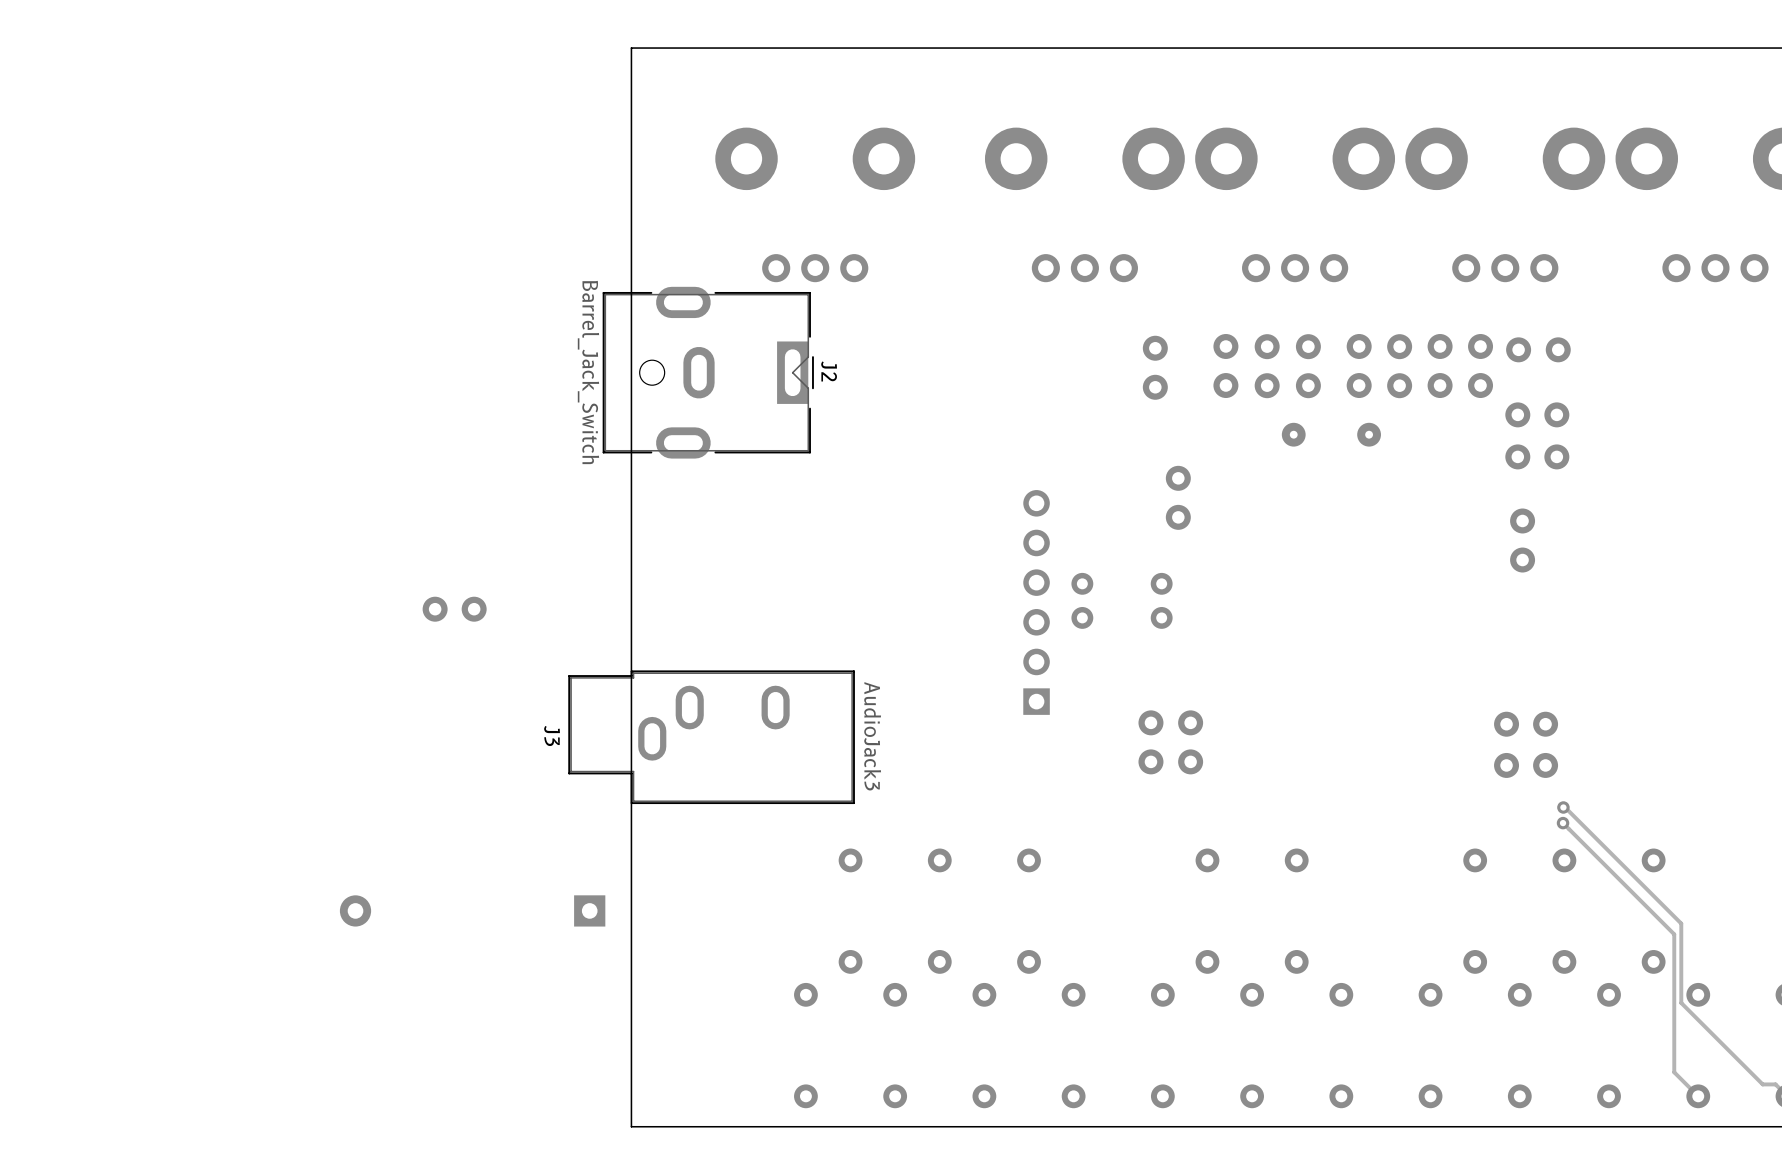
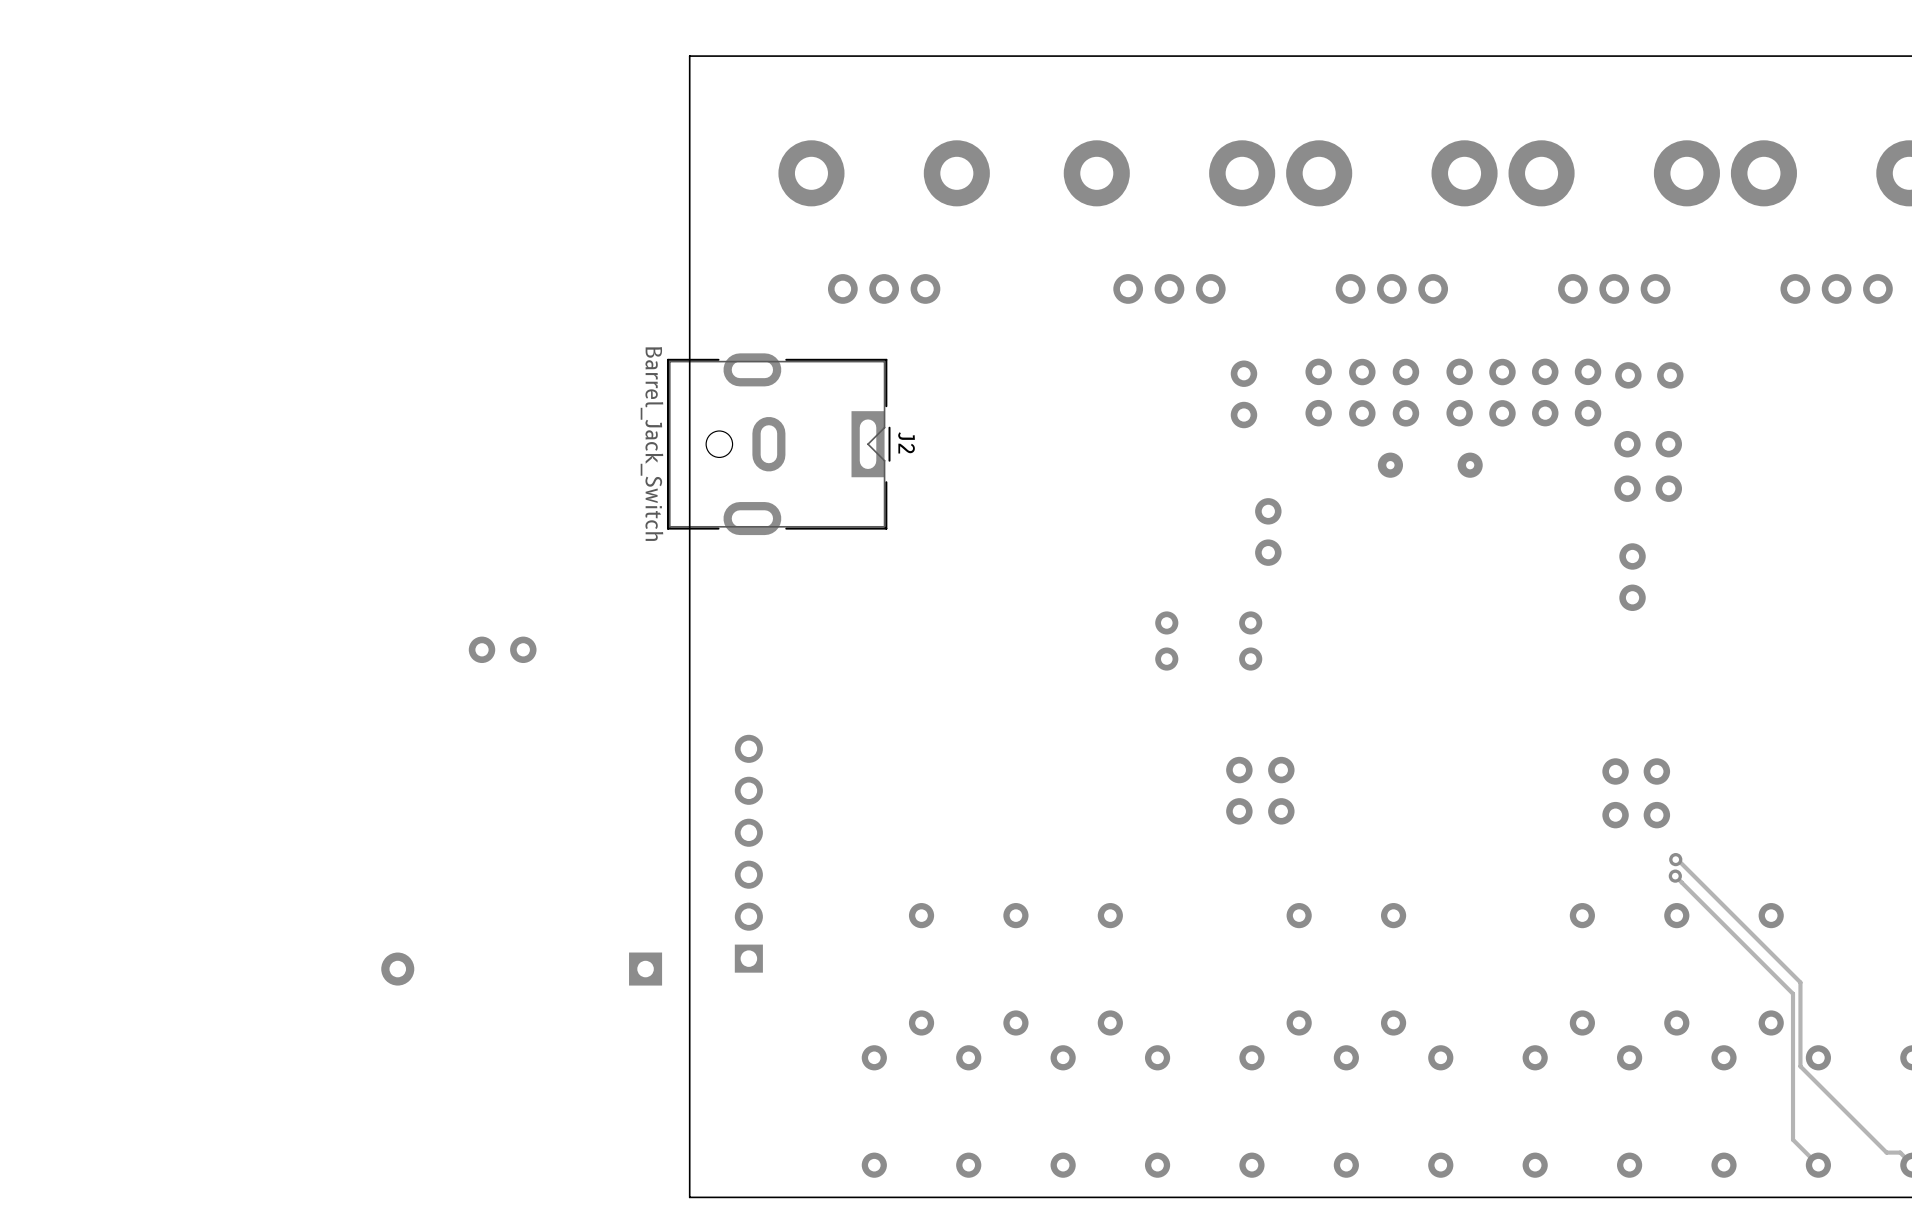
J2 position: (708, 372) -> (778, 444)
part: (1036, 602) -> none
J3: AudioJack3 (711, 737) -> none
part: none -> (748, 853)

